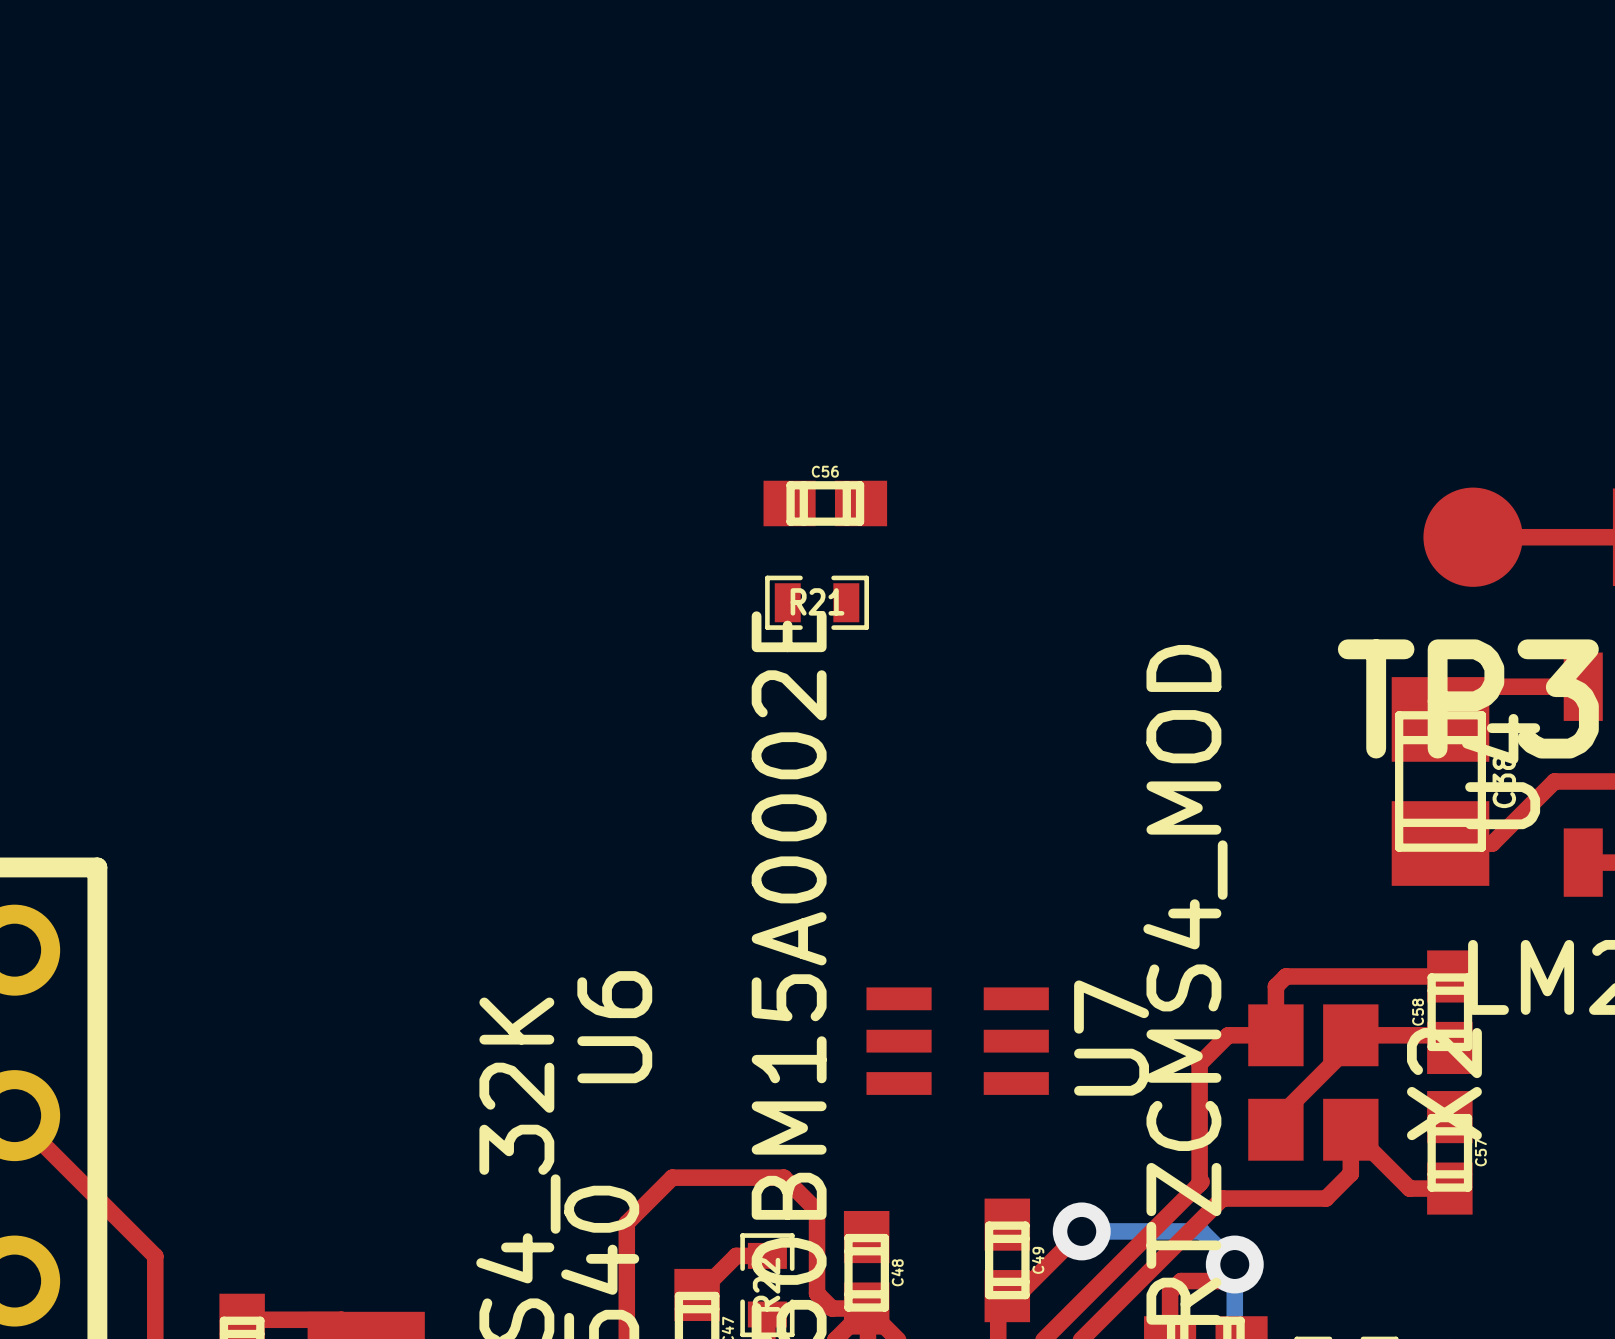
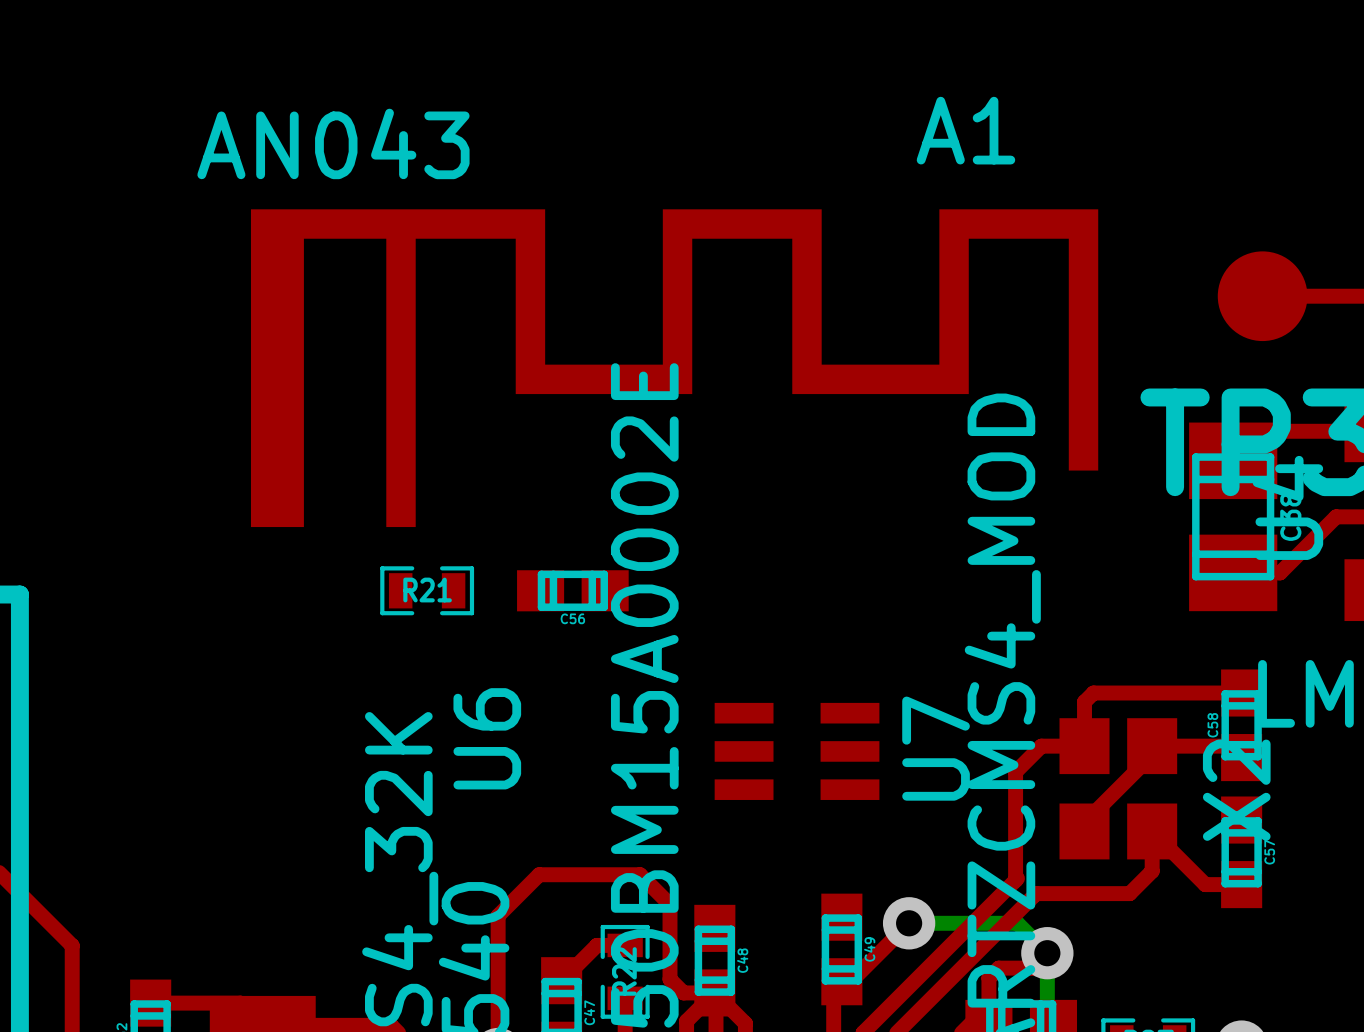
C56 name position: C56 (825, 471) -> C56 (572, 618)
C56 position: (825, 503) -> (572, 590)
R21 position: (817, 602) -> (427, 590)
A1: none -> AN043 (674, 368)

